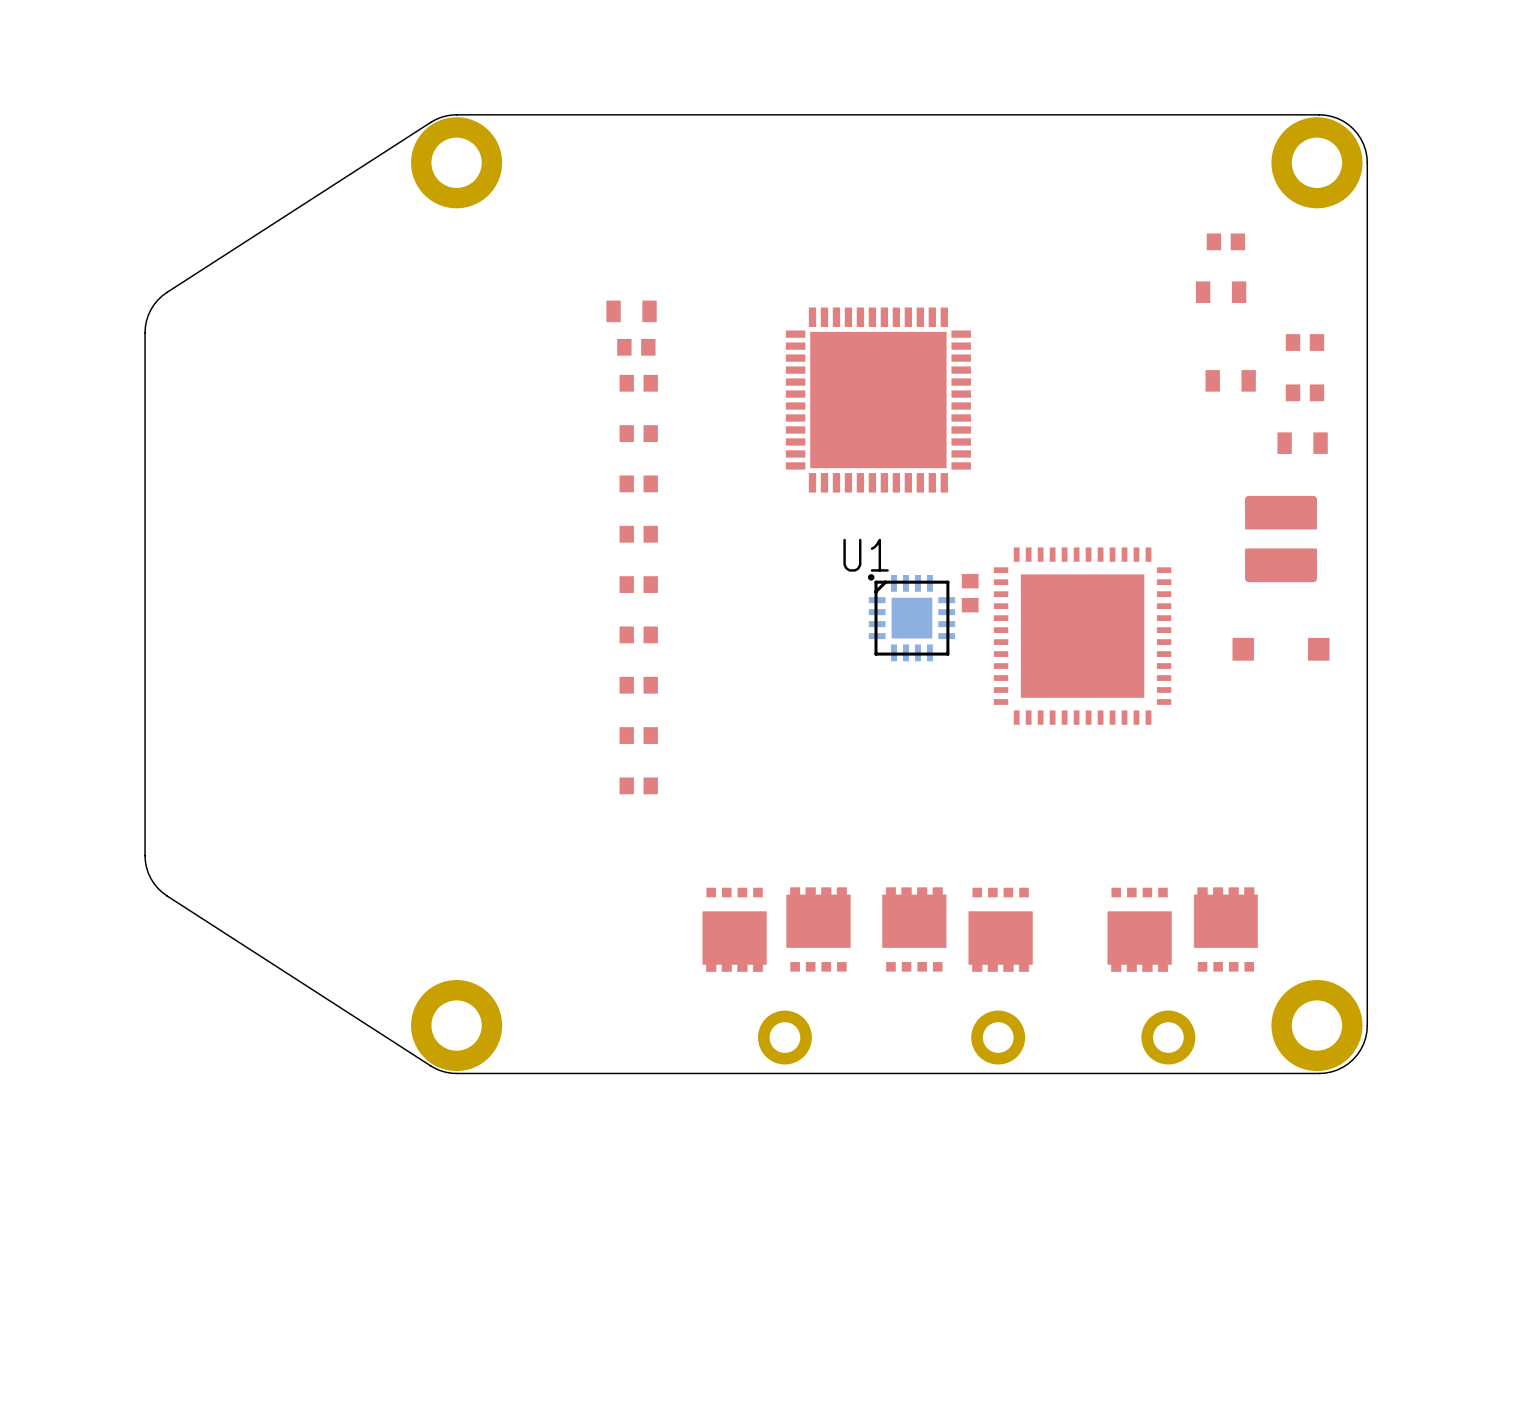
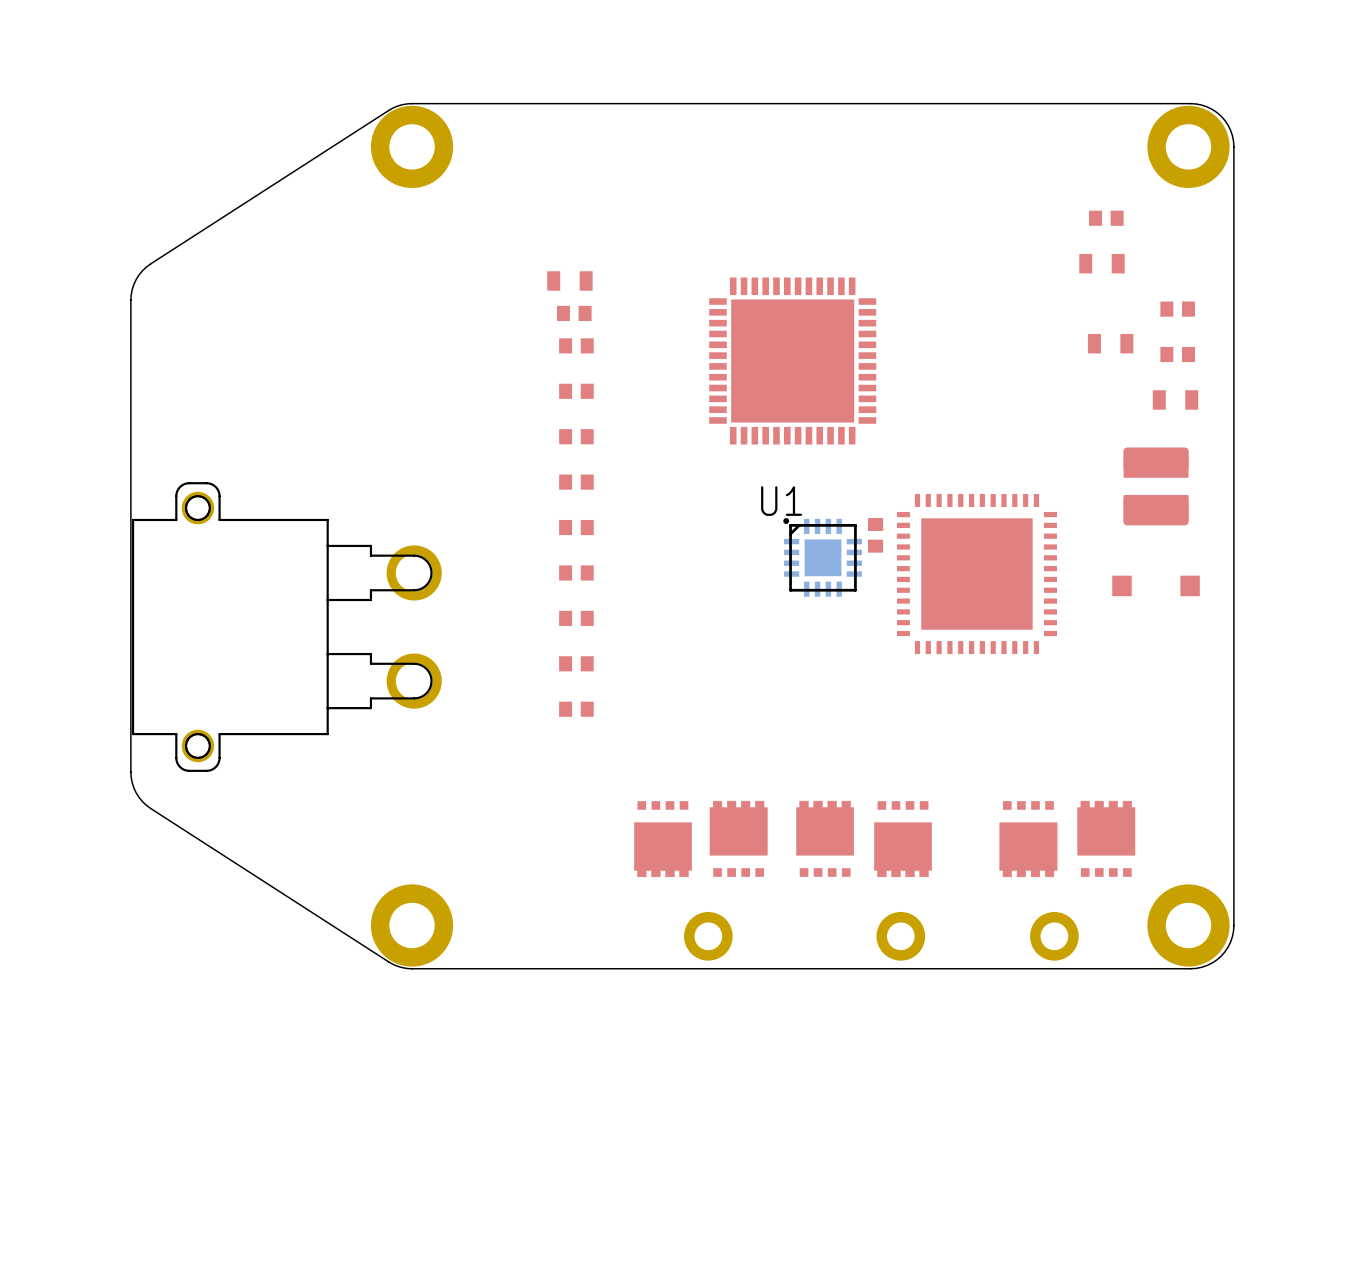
part: none -> (286, 627)

